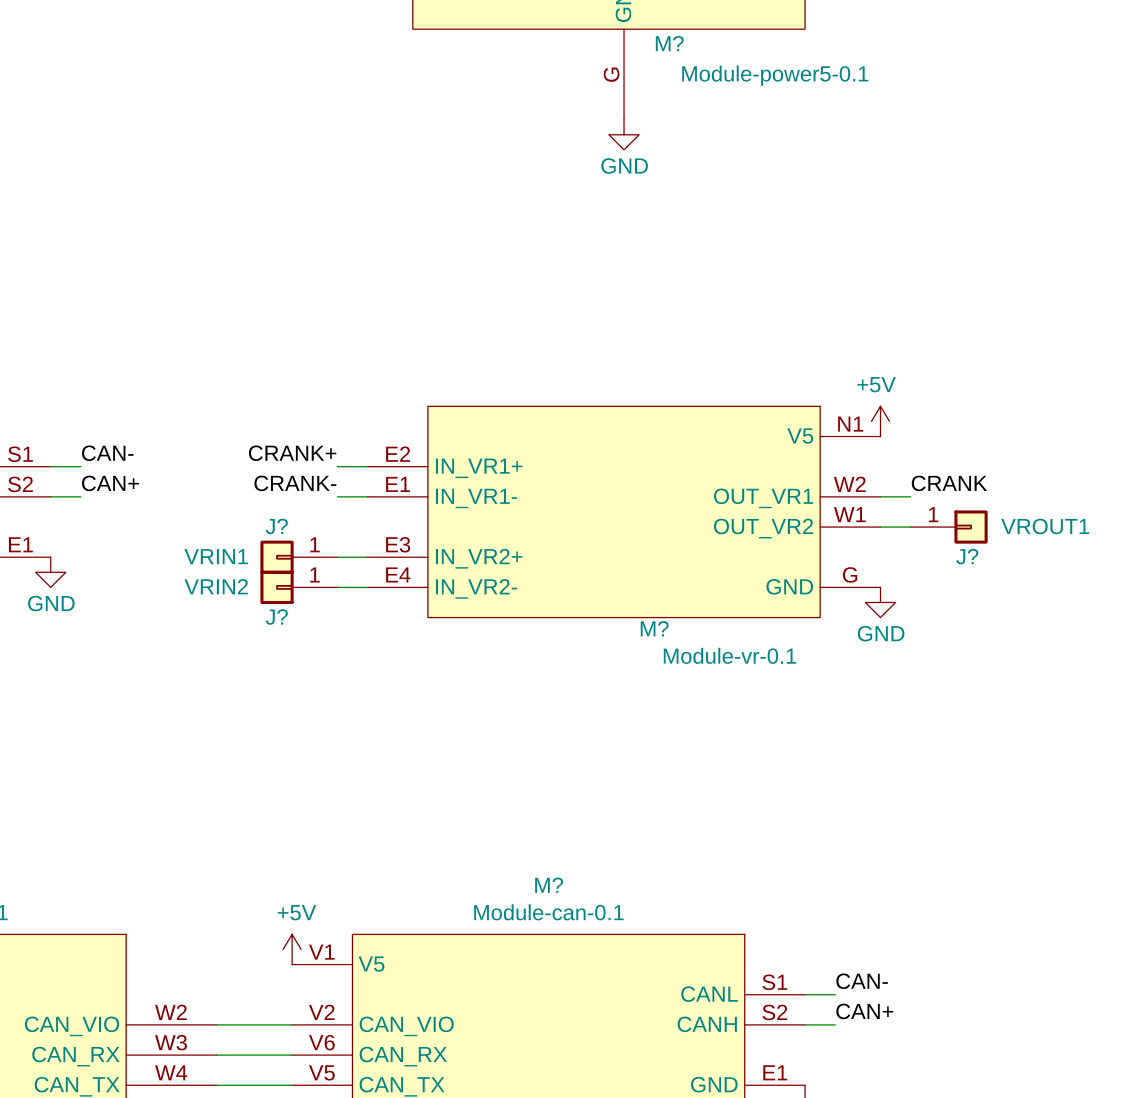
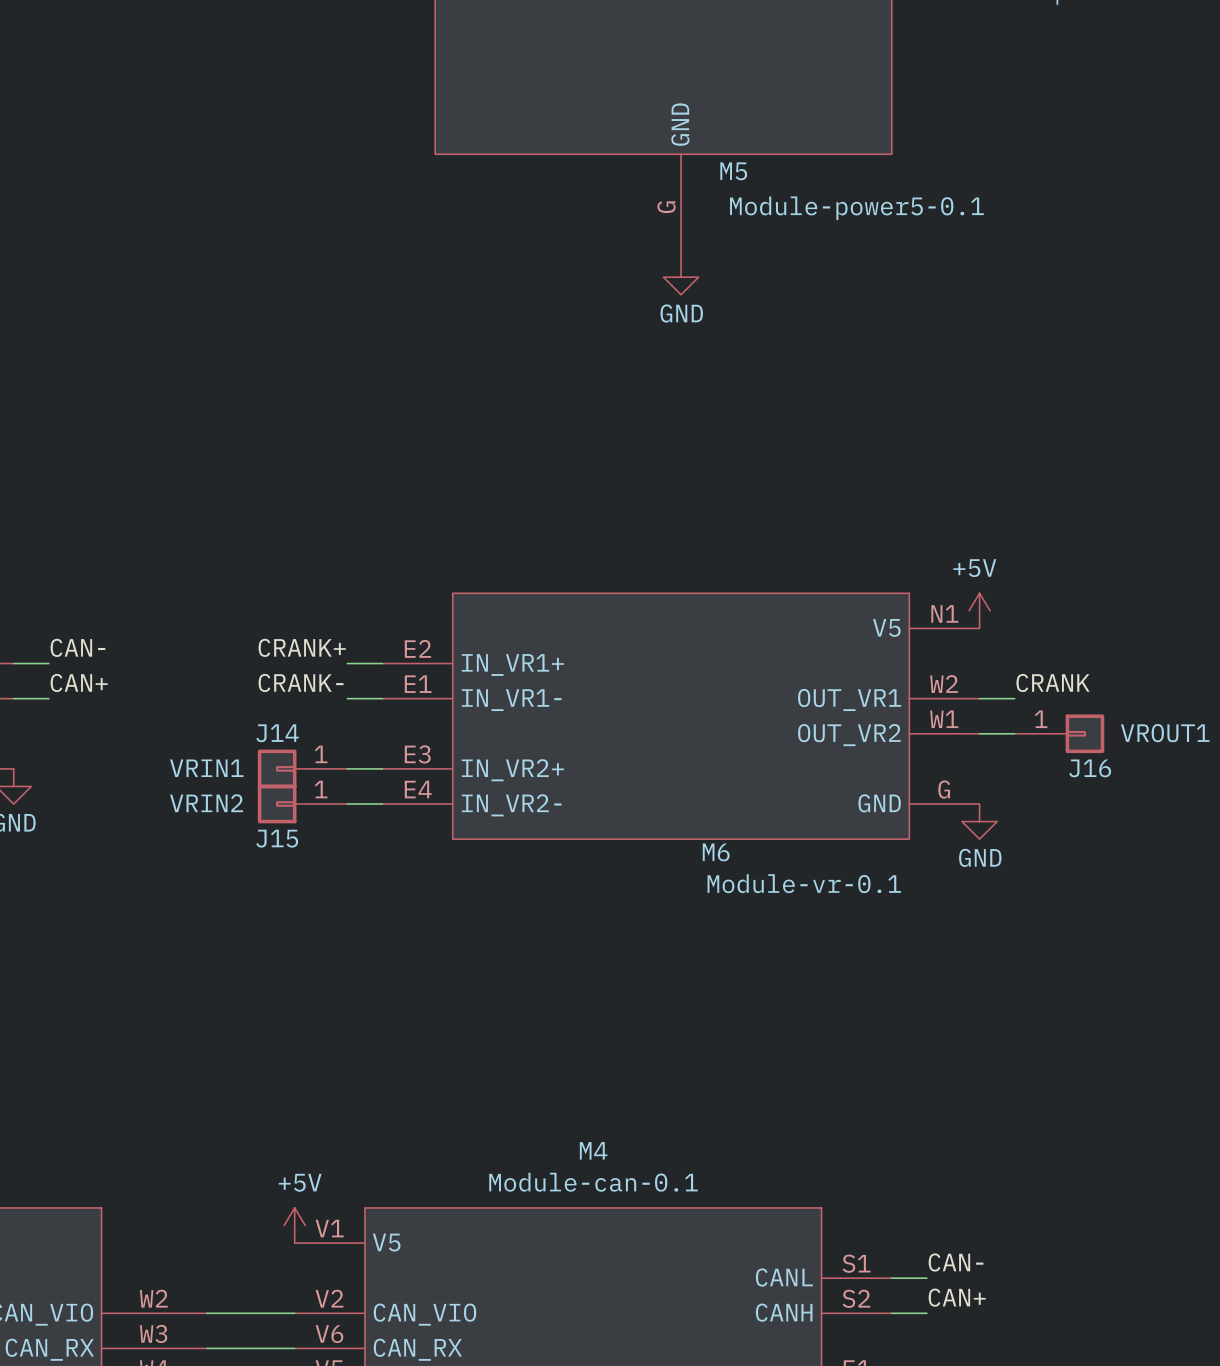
M? name: M? (669, 43) -> M5 (733, 171)
J? name: J? (276, 526) -> J14 (277, 733)
J? name: J? (967, 556) -> J16 (1090, 768)
J? name: J? (276, 617) -> J15 (277, 838)
M? name: M? (654, 628) -> M6 (716, 852)
M? name: M? (549, 885) -> M4 (593, 1150)

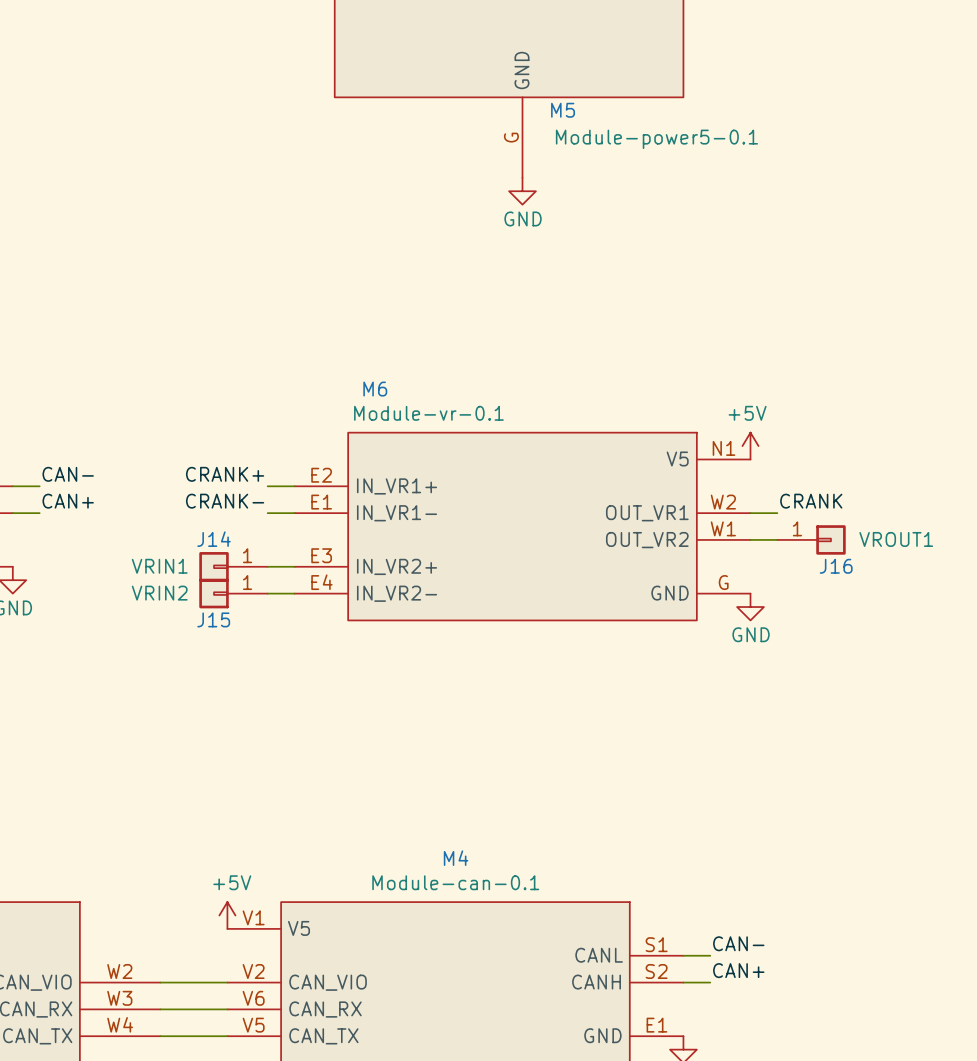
M6 name position: M6 (716, 852) -> M6 (375, 389)
M6 value position: Module-vr-0.1 (804, 883) -> Module-vr-0.1 (428, 413)

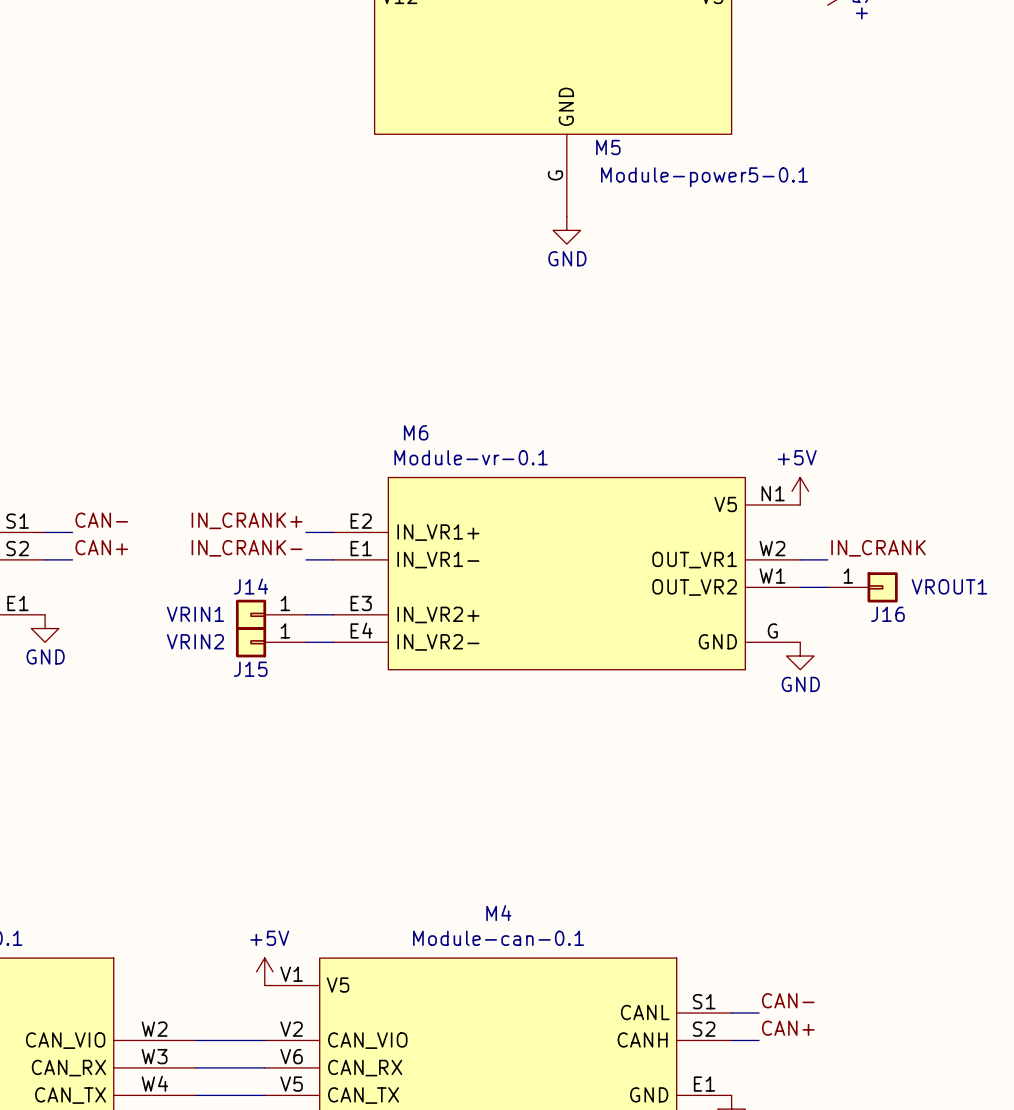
label: CRANK+ (225, 474) -> IN_CRANK+ (247, 520)
label: CRANK- (225, 501) -> IN_CRANK- (247, 548)
label: CRANK (811, 501) -> IN_CRANK (878, 548)

